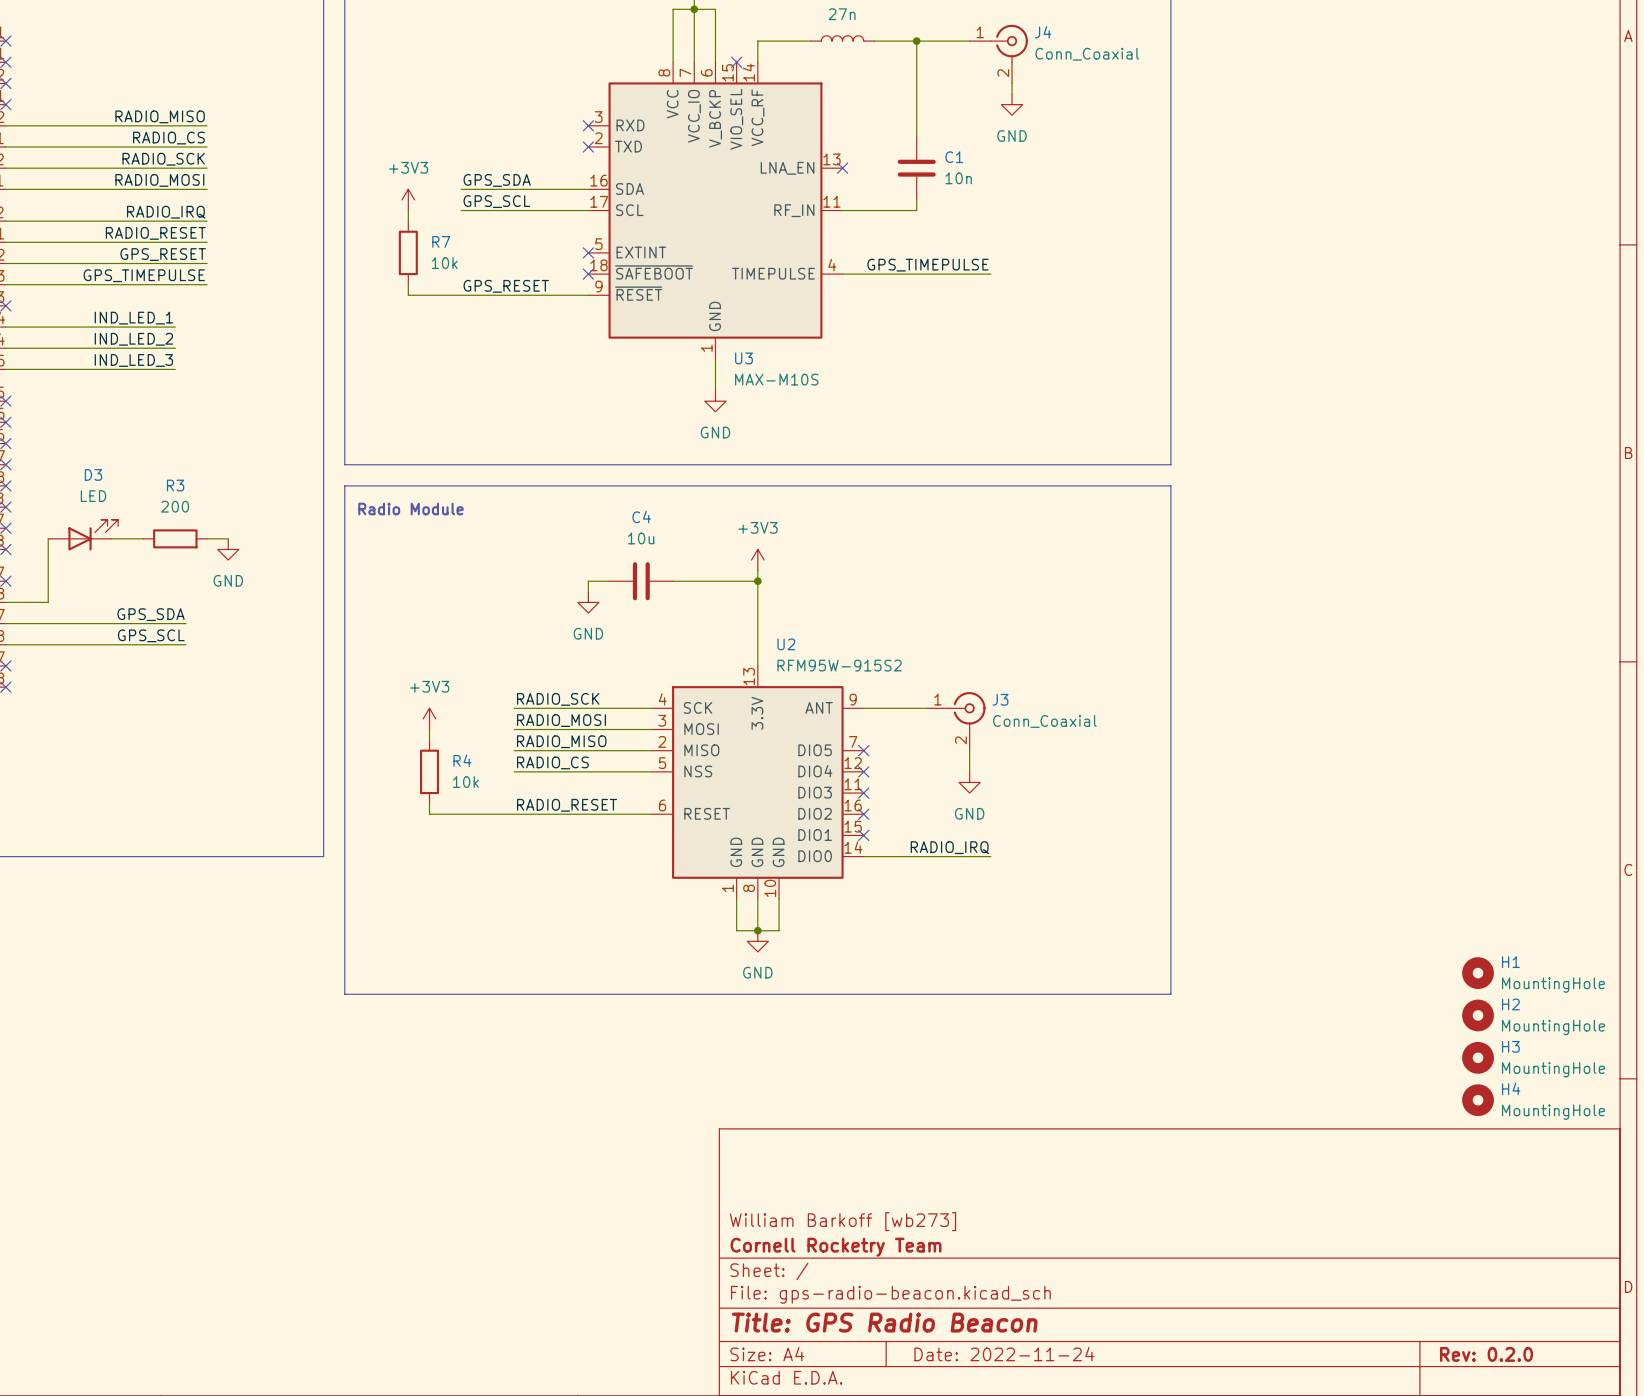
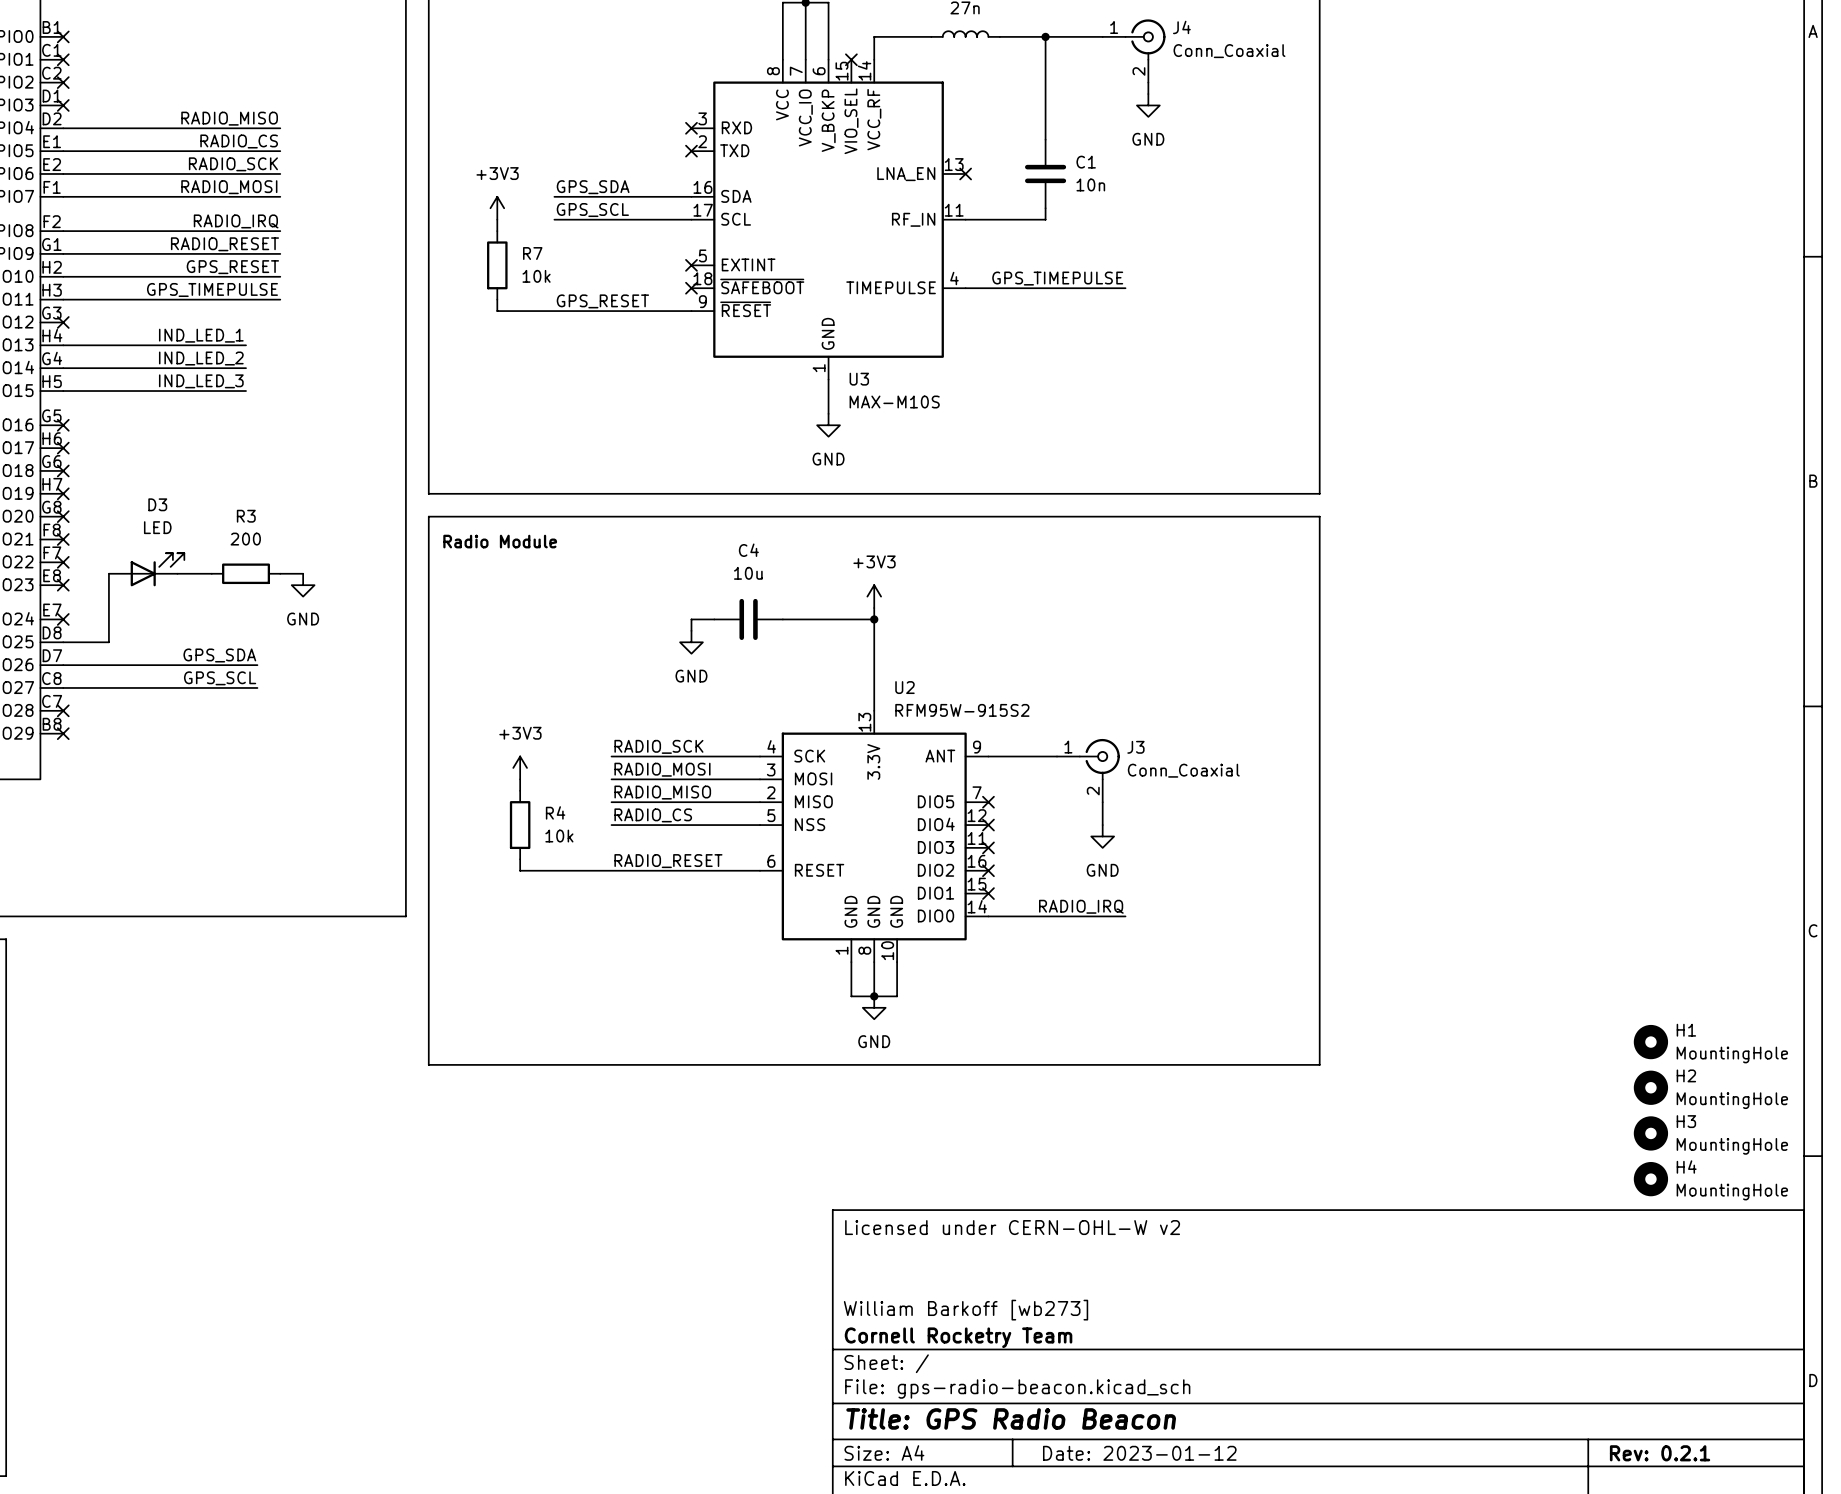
title block: none -> Licensed under CERN-OHL-W v2 (1012, 1227)
title block: Date: 2022-11-24 (1004, 1354) -> Date: 2023-01-12 (1139, 1453)
title block: Rev: 0.2.0 (1486, 1354) -> Rev: 0.2.1 (1660, 1453)

